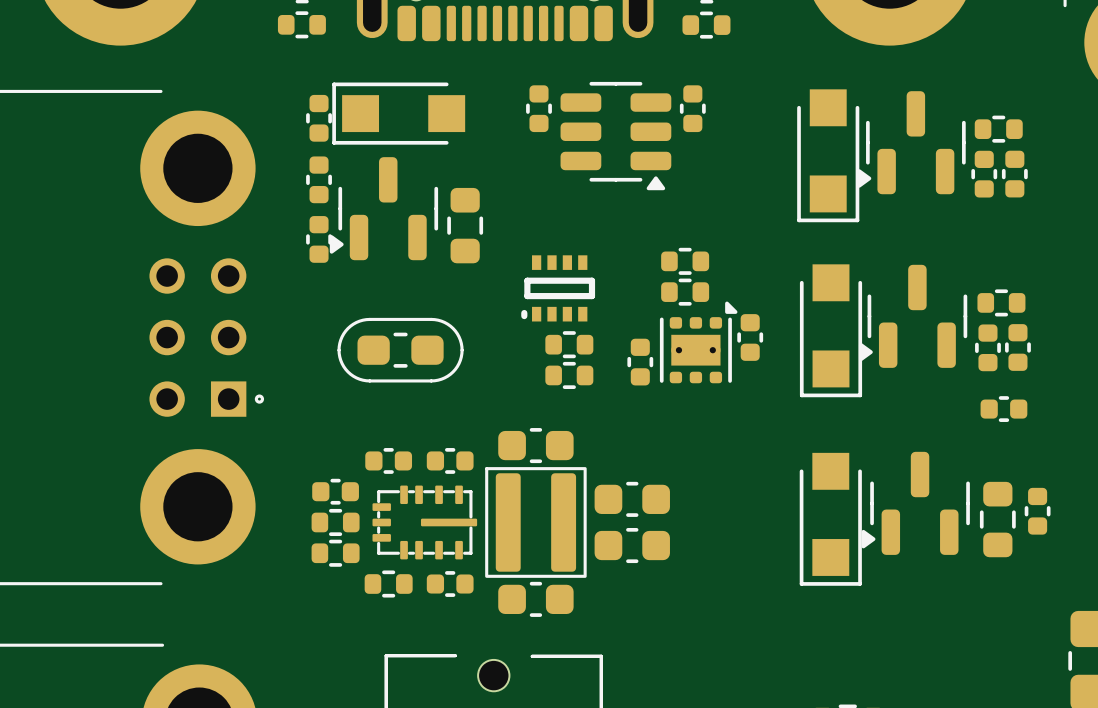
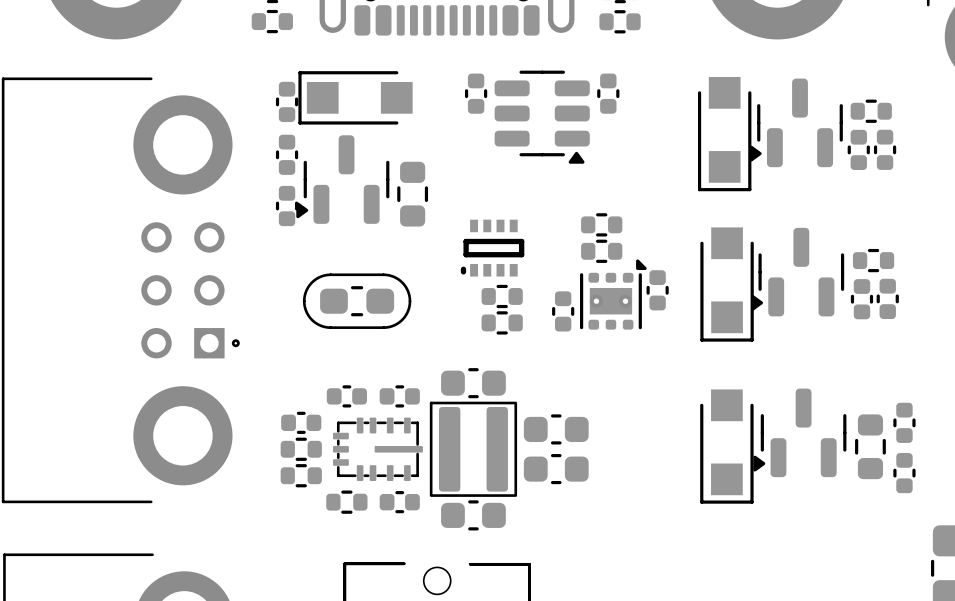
part: (1003, 409) -> none
part: none -> (904, 422)
part: (1037, 511) -> none
part: none -> (904, 473)

